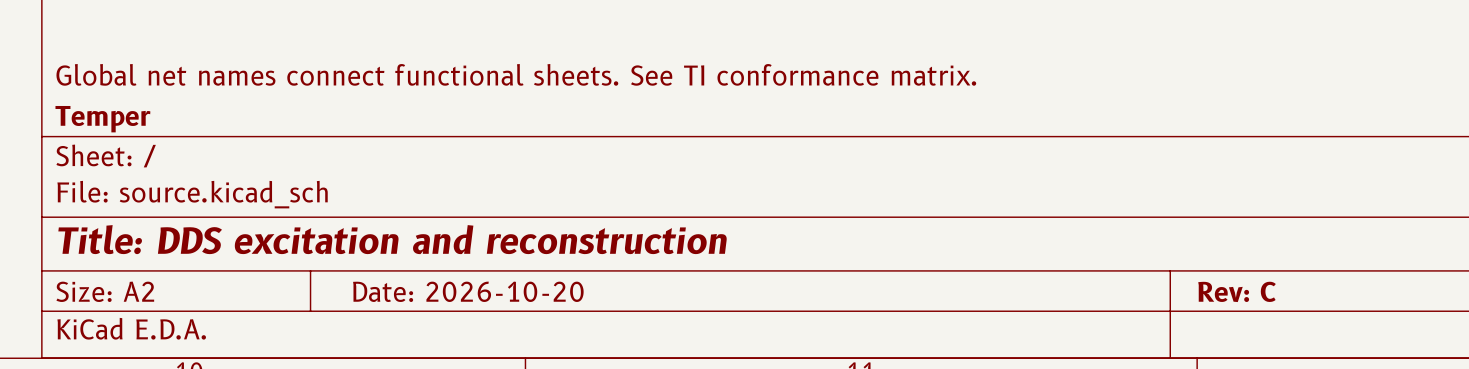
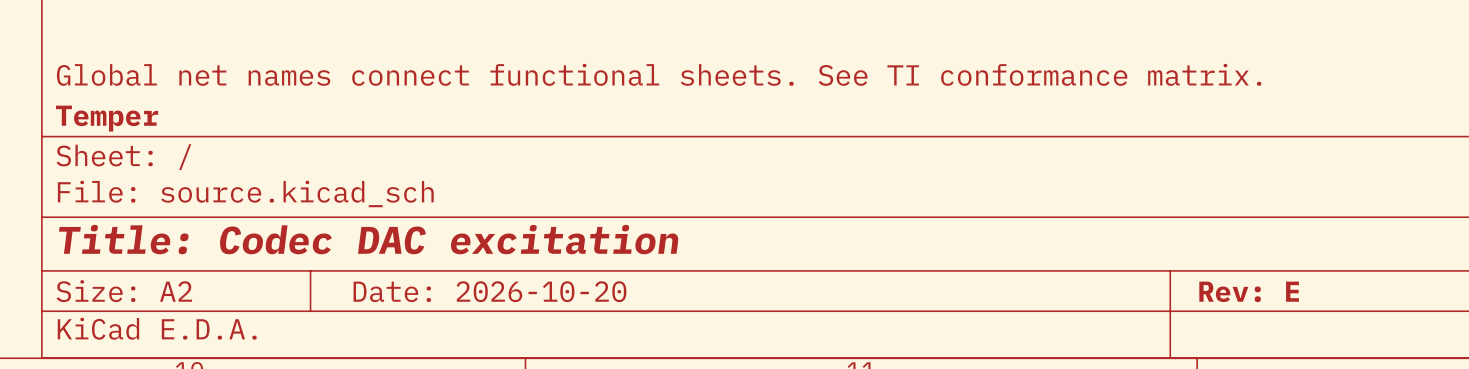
title block: Title: DDS excitation and reconstruction (392, 239) -> Title: Codec DAC excitation (368, 239)
title block: Rev: C (1237, 291) -> Rev: E (1249, 291)

